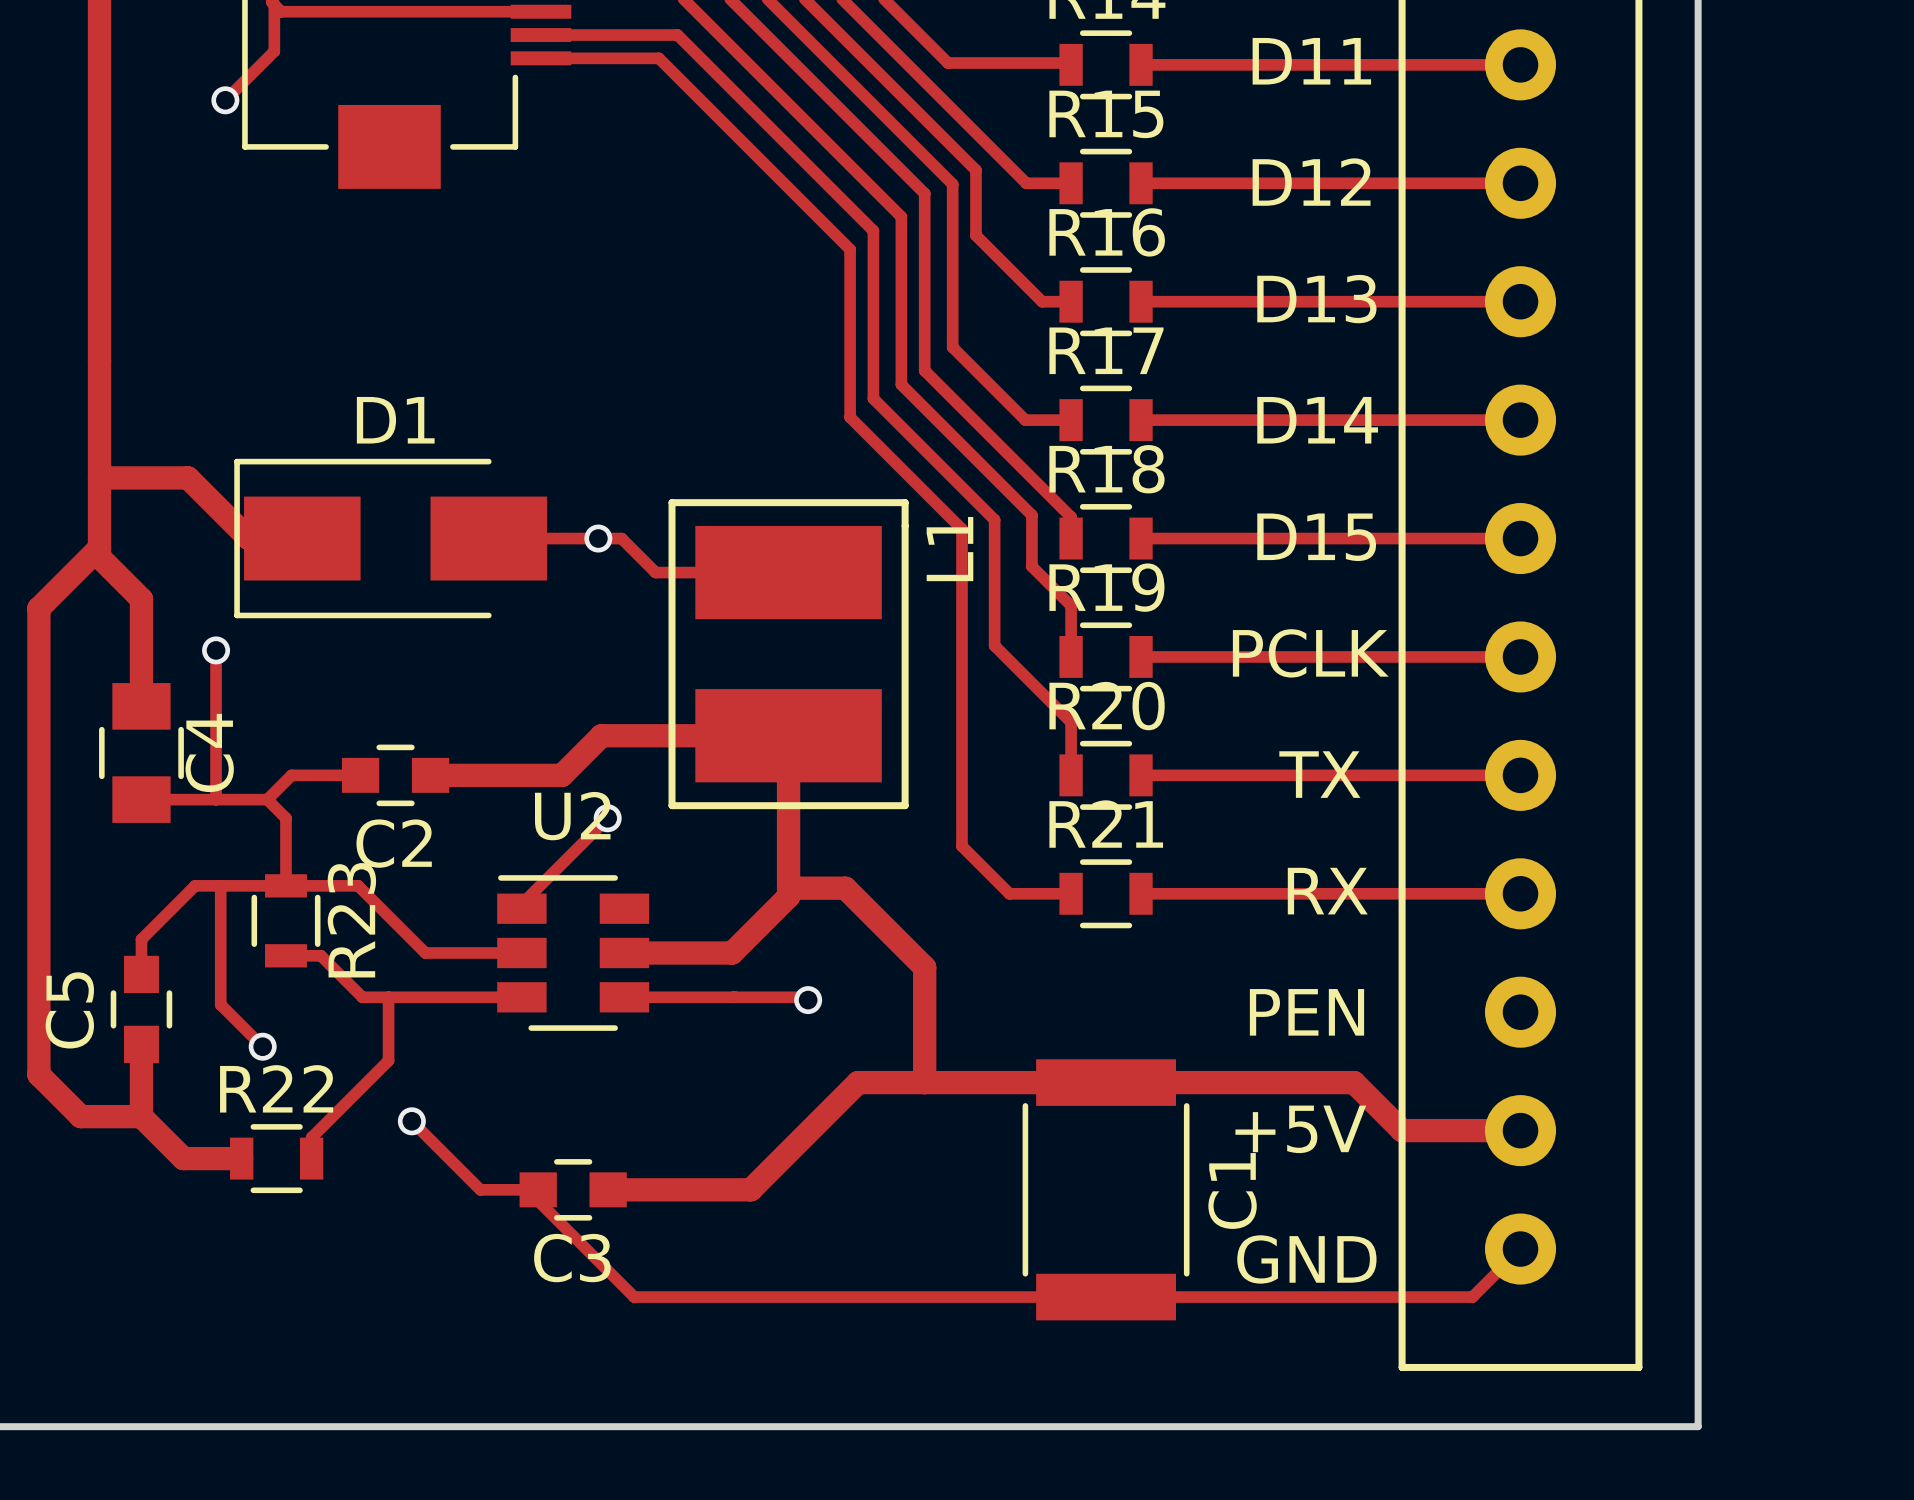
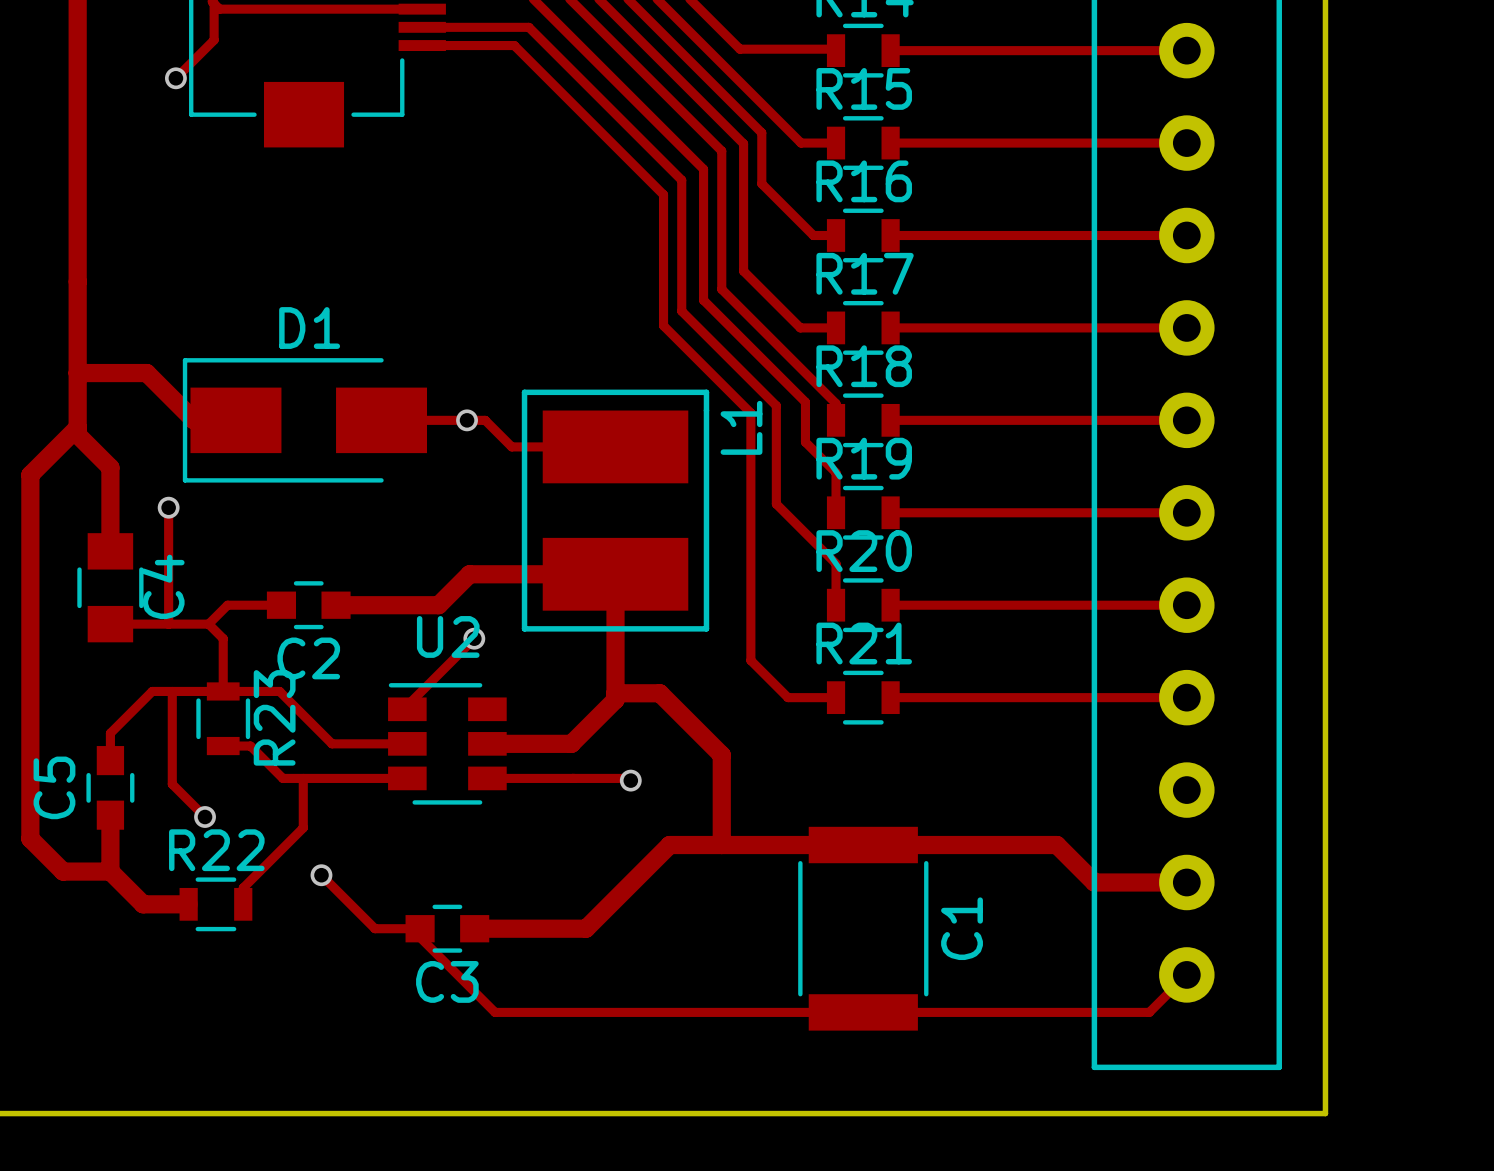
text: D11 (1311, 61) -> none
text: D12 (1311, 182) -> none
text: D13 (1316, 299) -> none
text: D14 (1317, 420) -> none
text: D15 (1316, 537) -> none
text: PCLK (1310, 653) -> none
text: TX (1319, 774) -> none
text: RX (1327, 891) -> none
text: PEN (1306, 1012) -> none
text: +5V (1300, 1129) -> none
text: GND (1306, 1259) -> none

